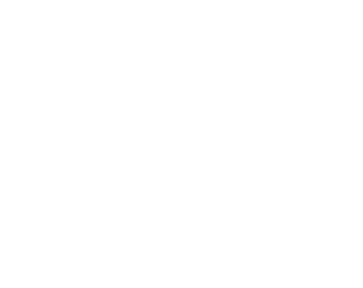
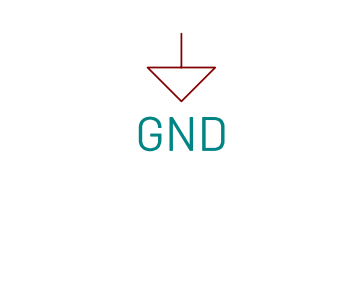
power symbol: none -> GND (181, 67)

